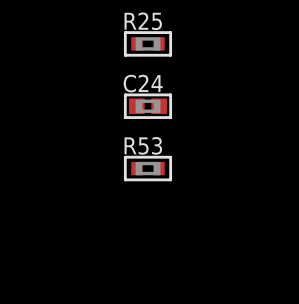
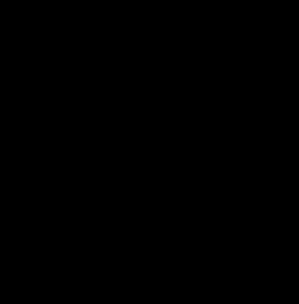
R25: (147, 43) -> none
C24: (147, 106) -> none
R53: (147, 168) -> none

